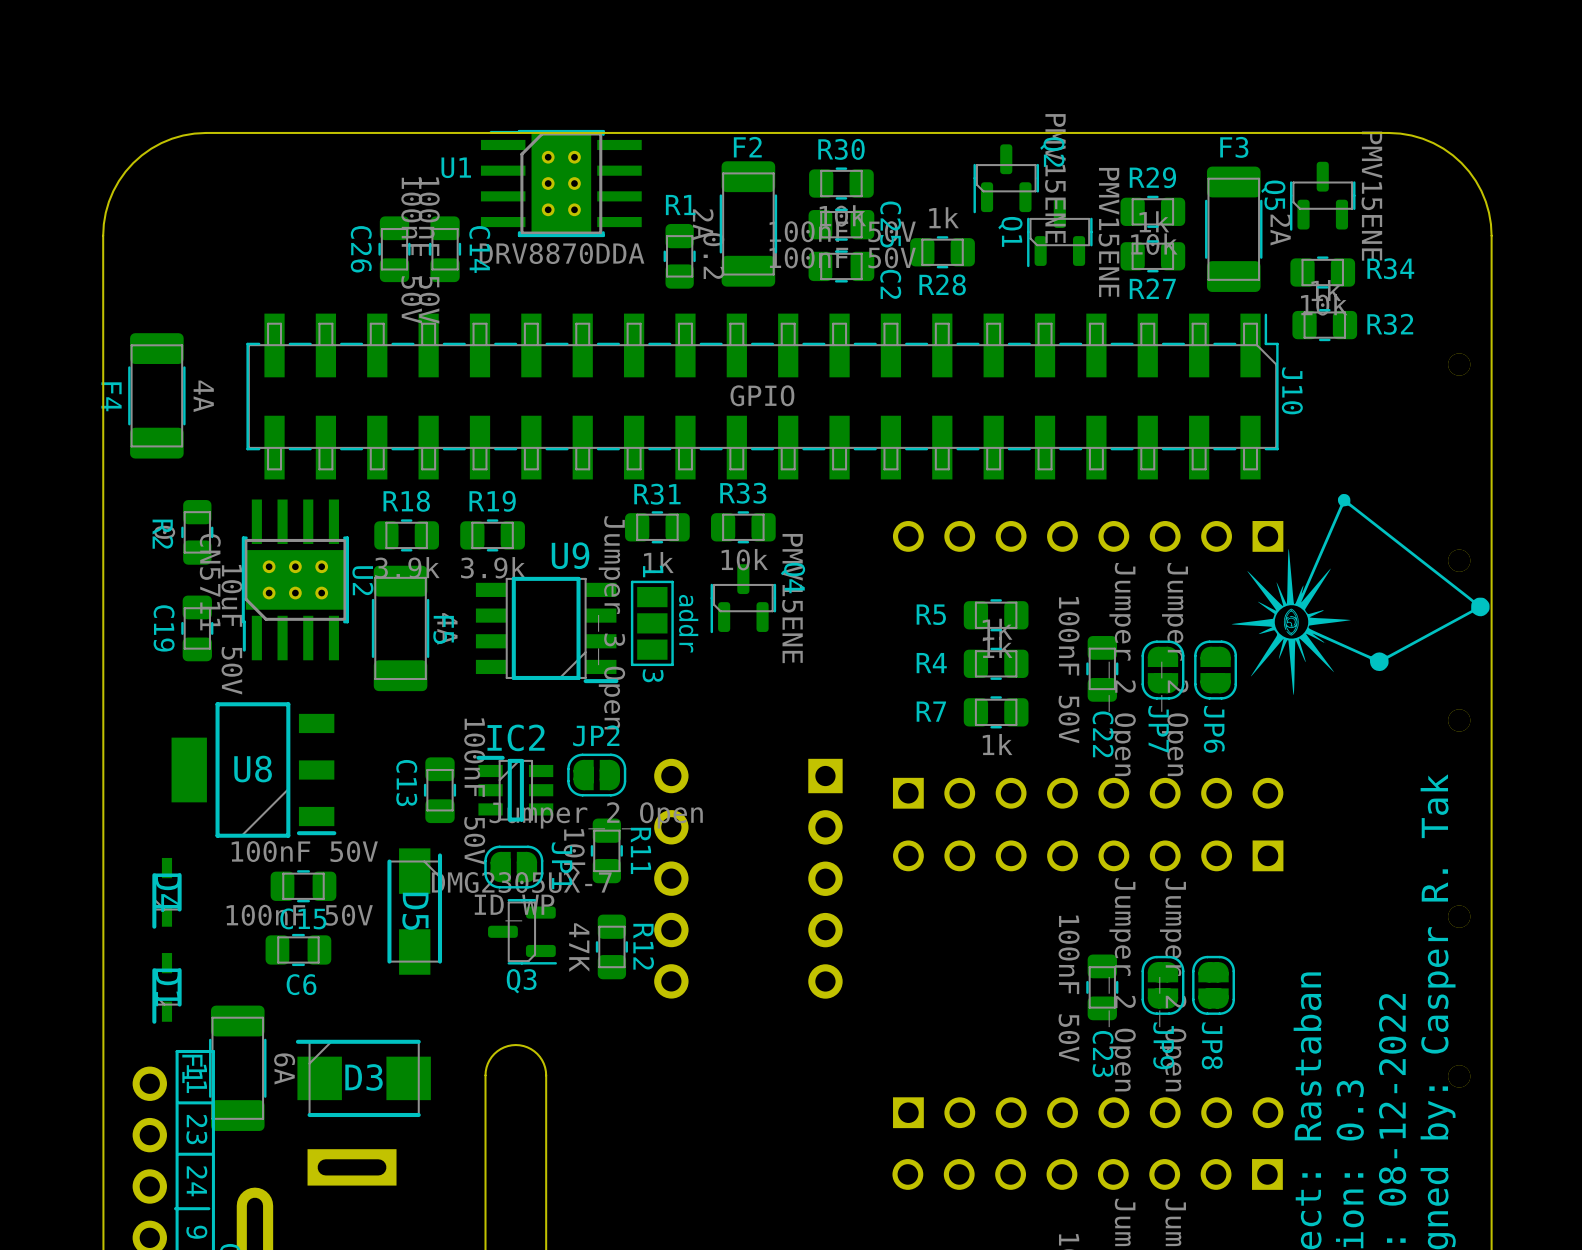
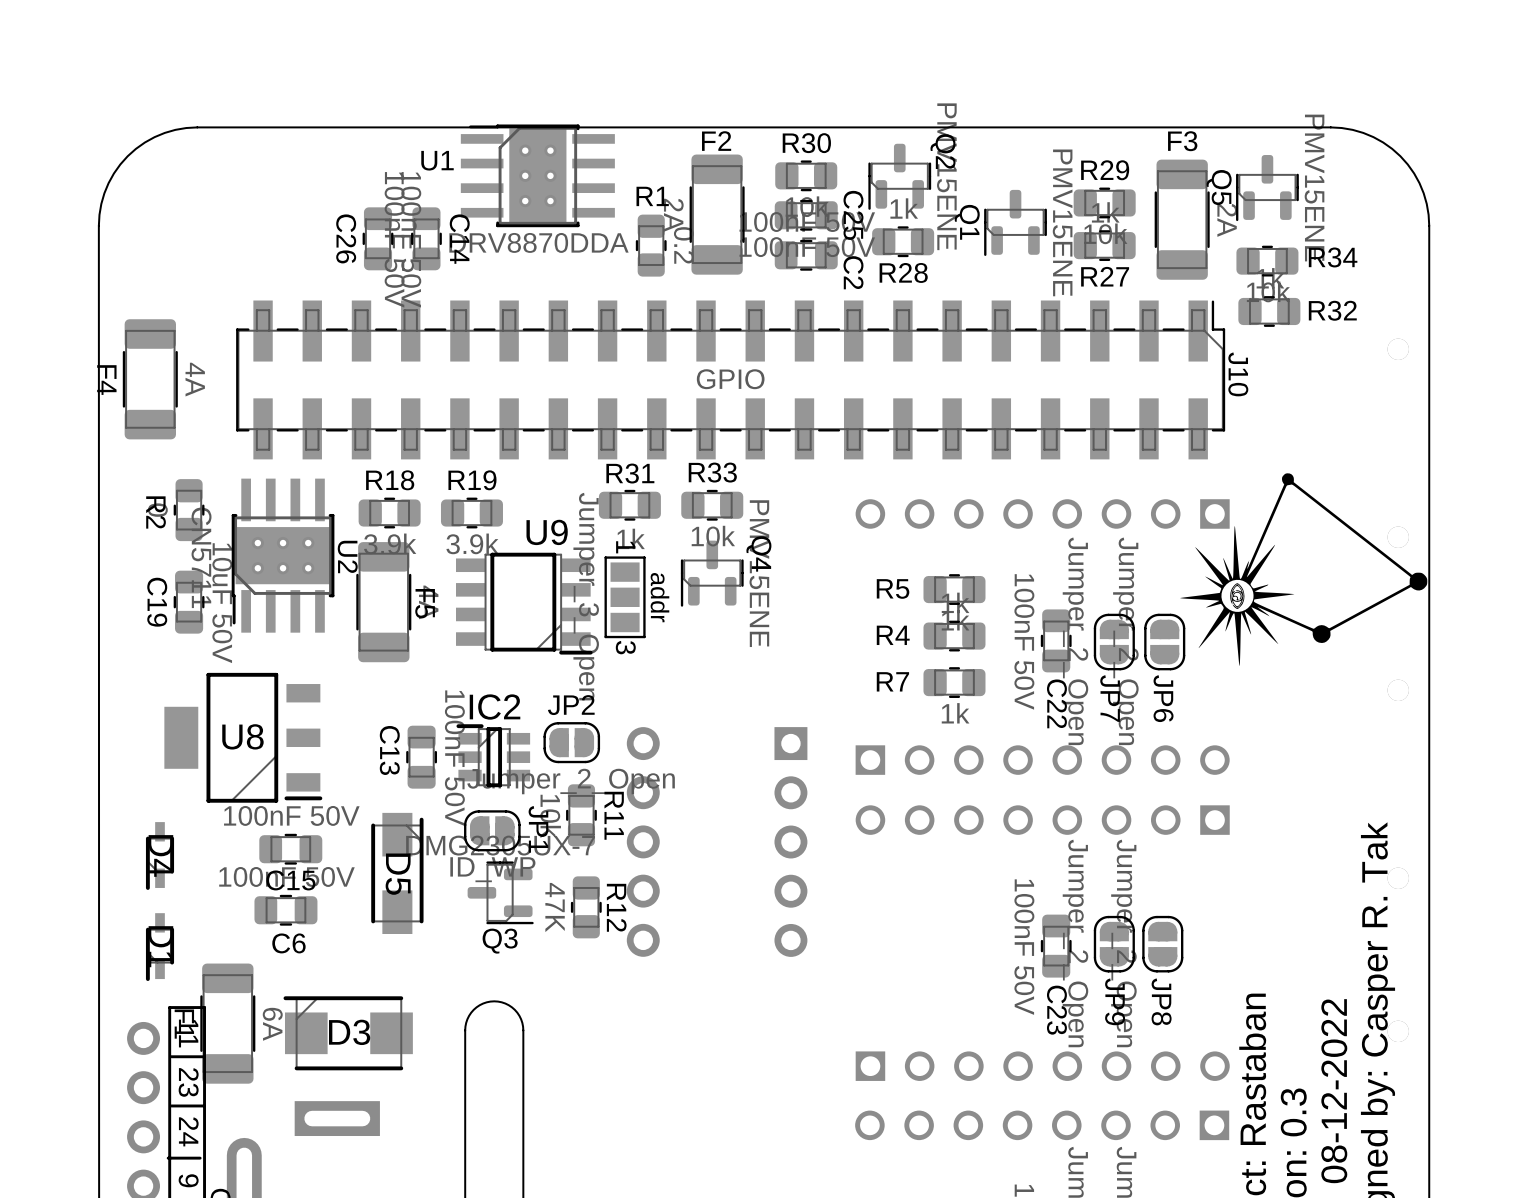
Q2 position: (1006, 178) -> (899, 176)

